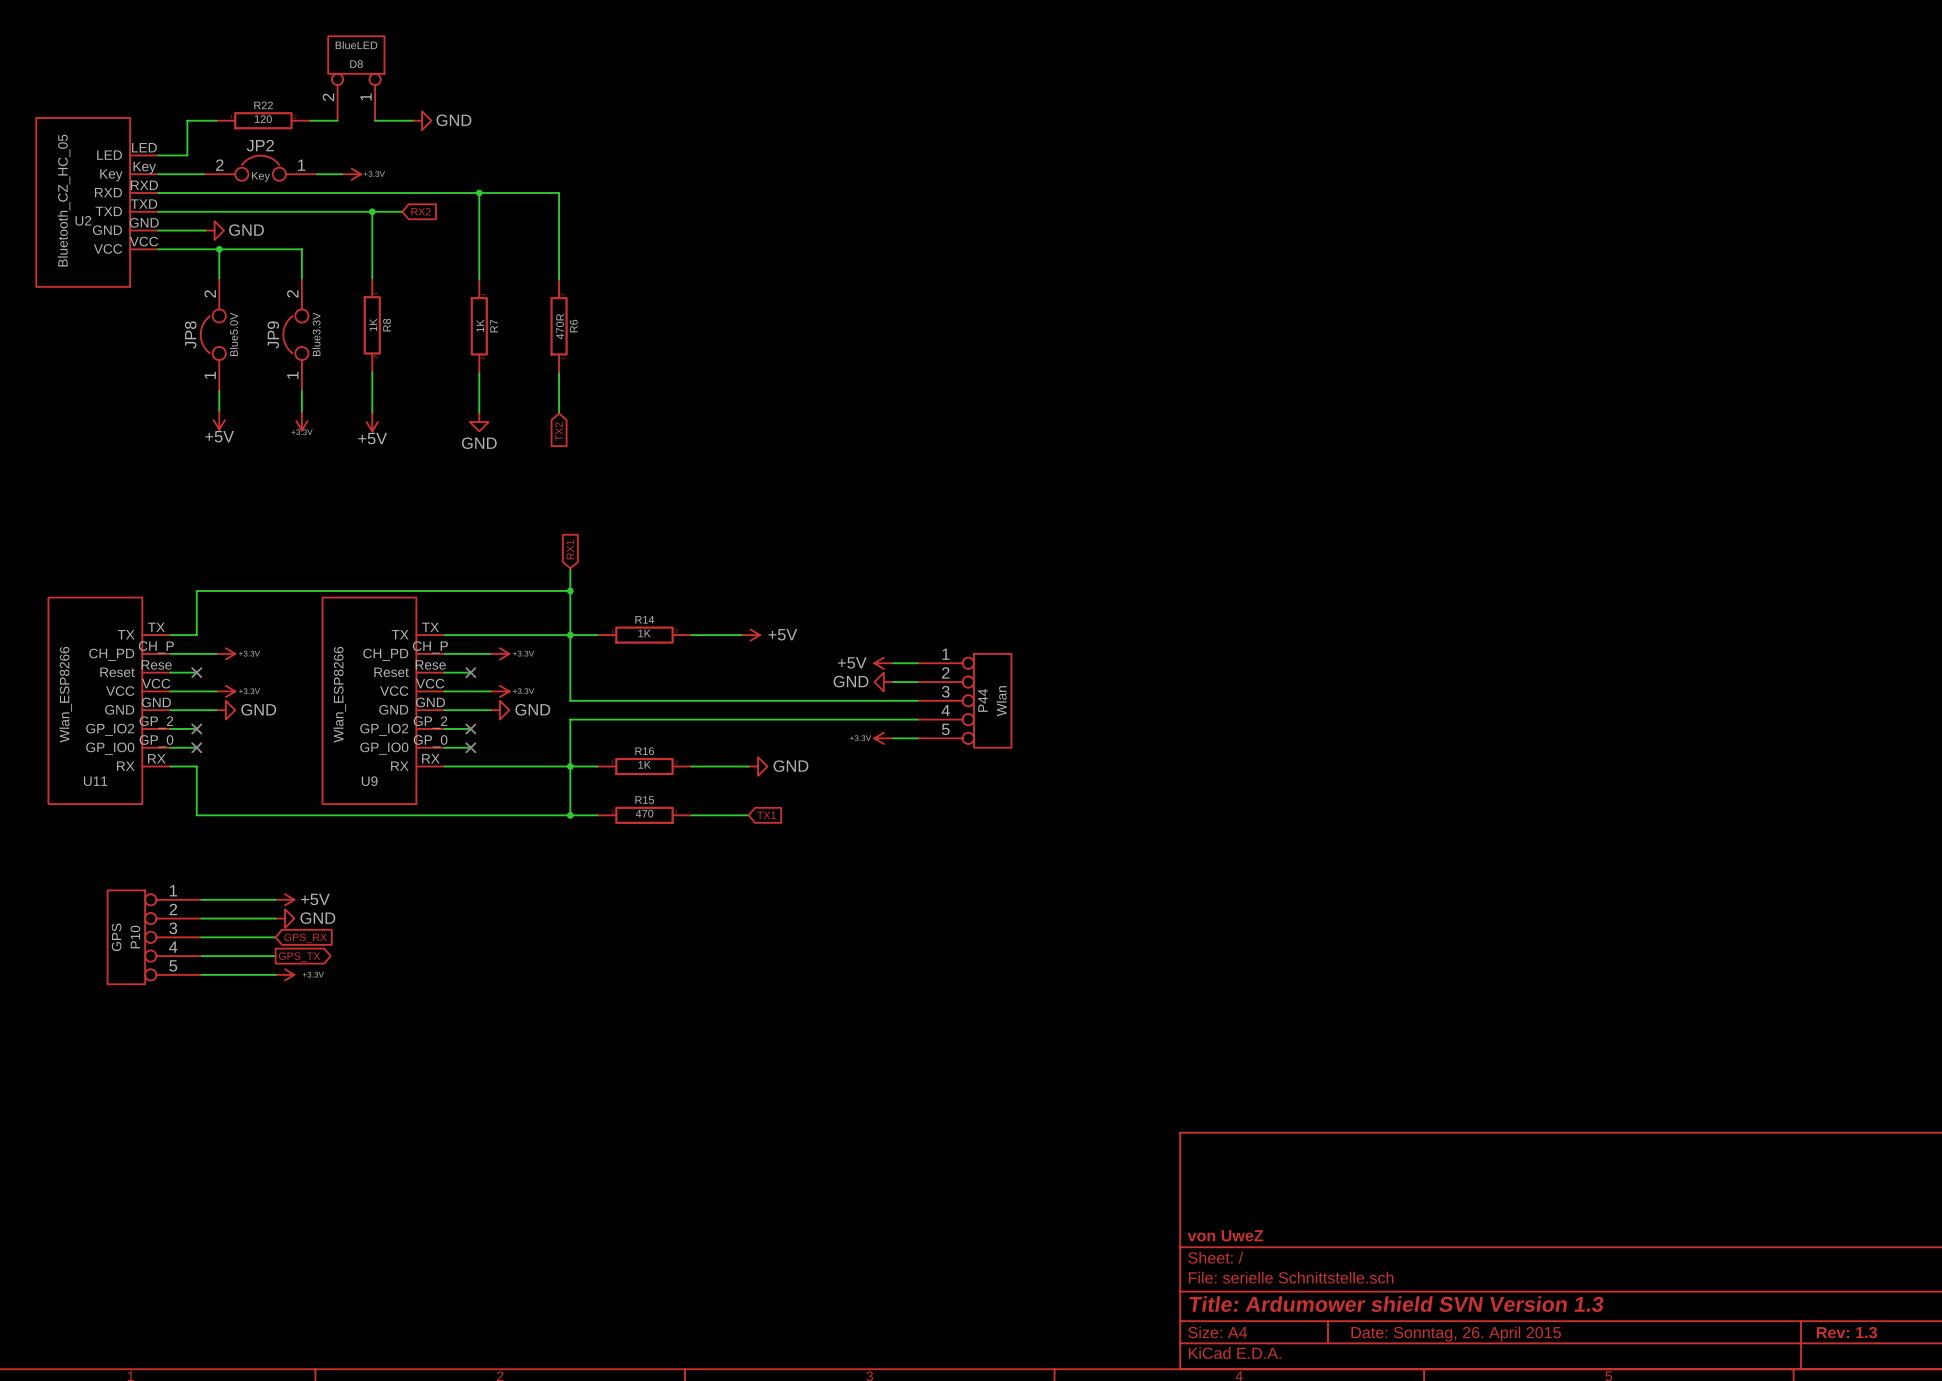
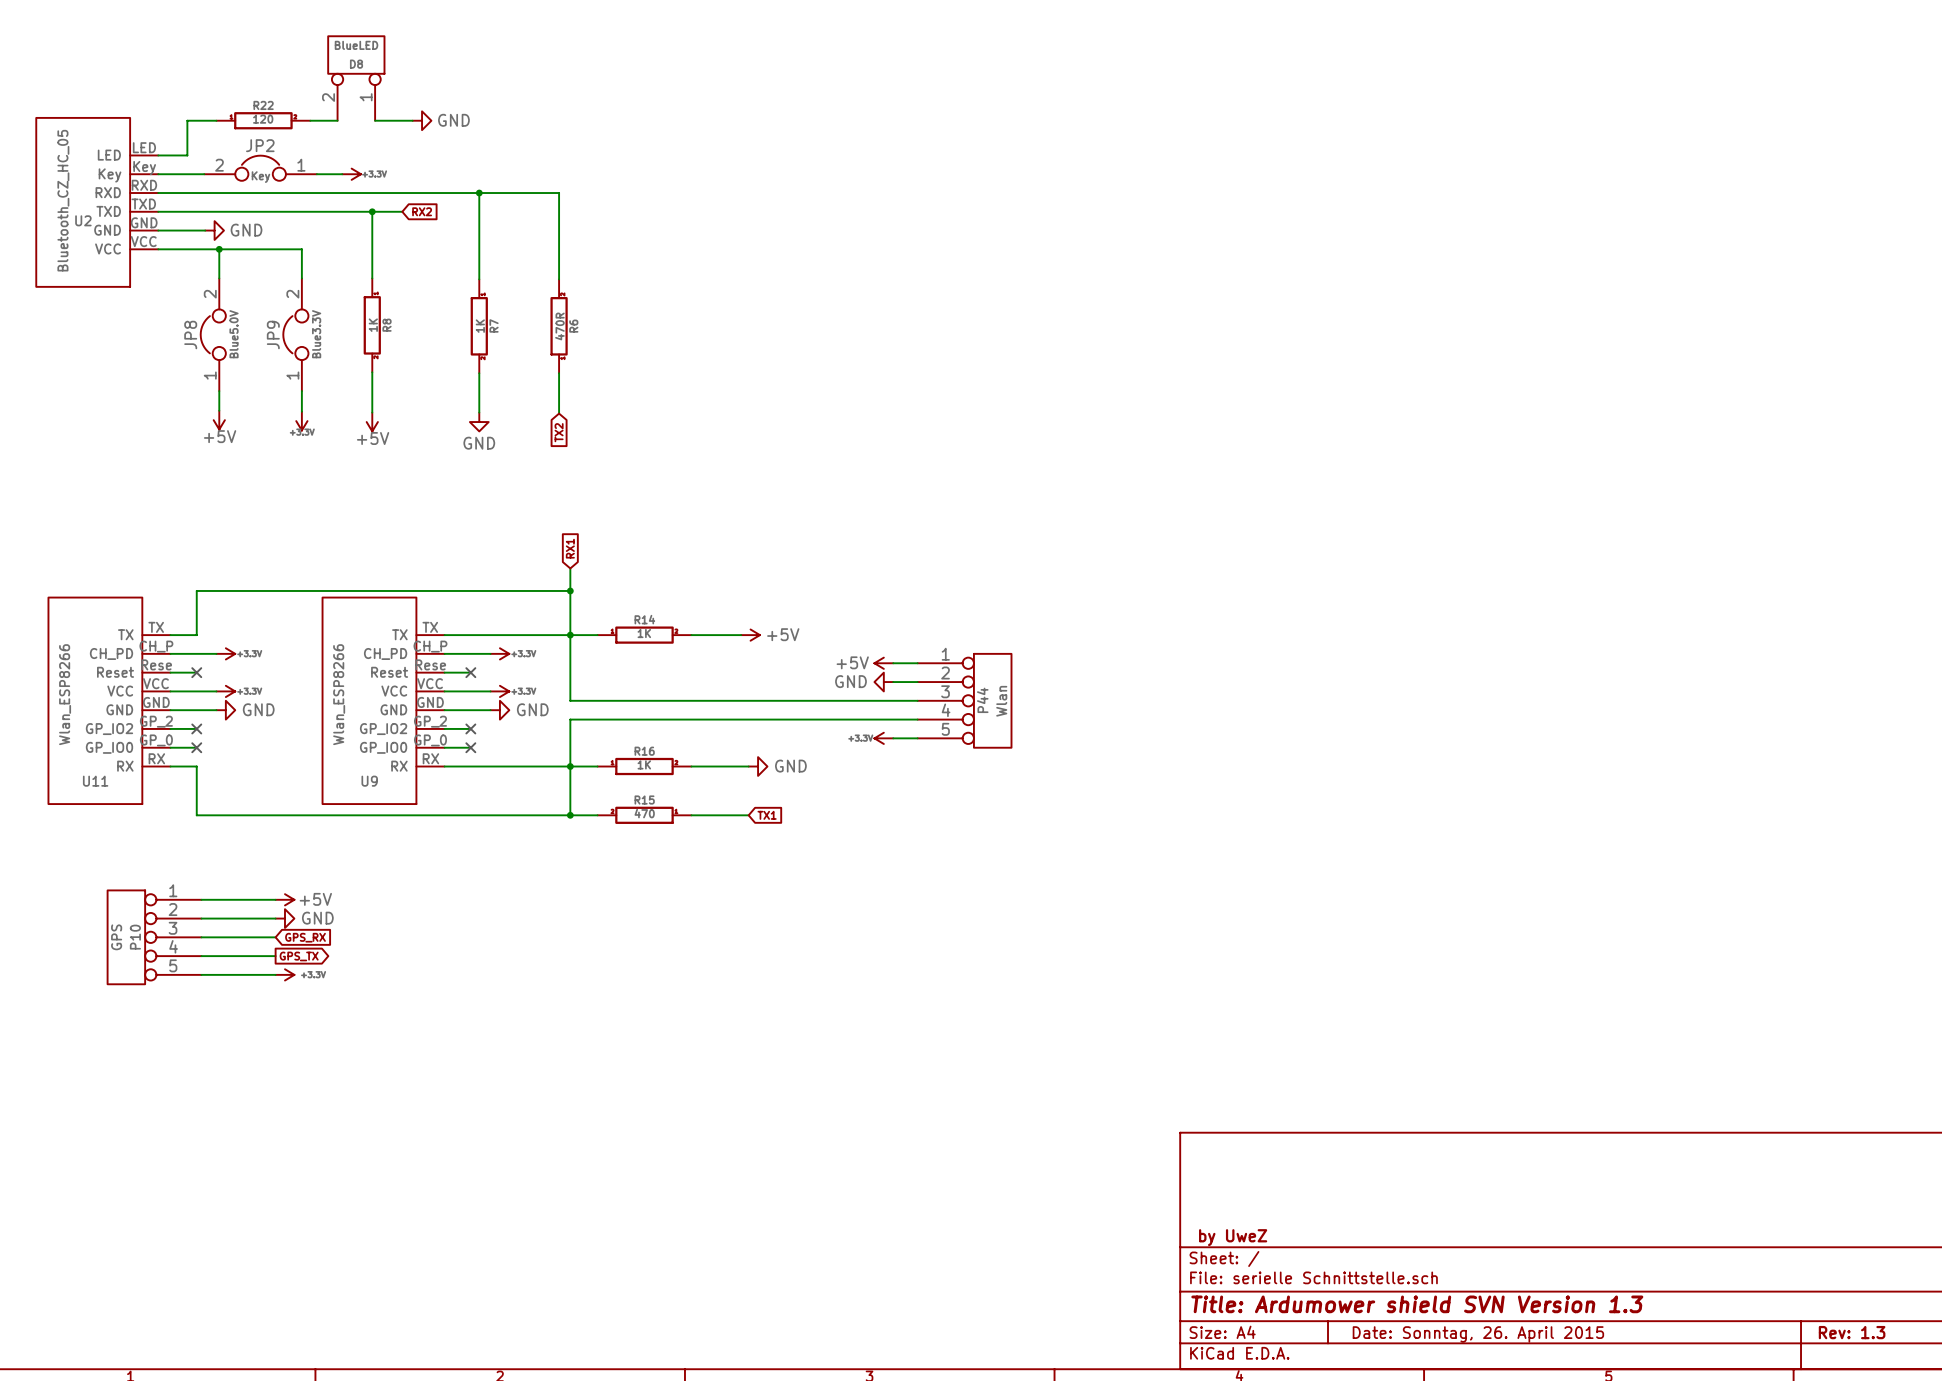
title block: von UweZ (1225, 1235) -> by UweZ (1233, 1237)

